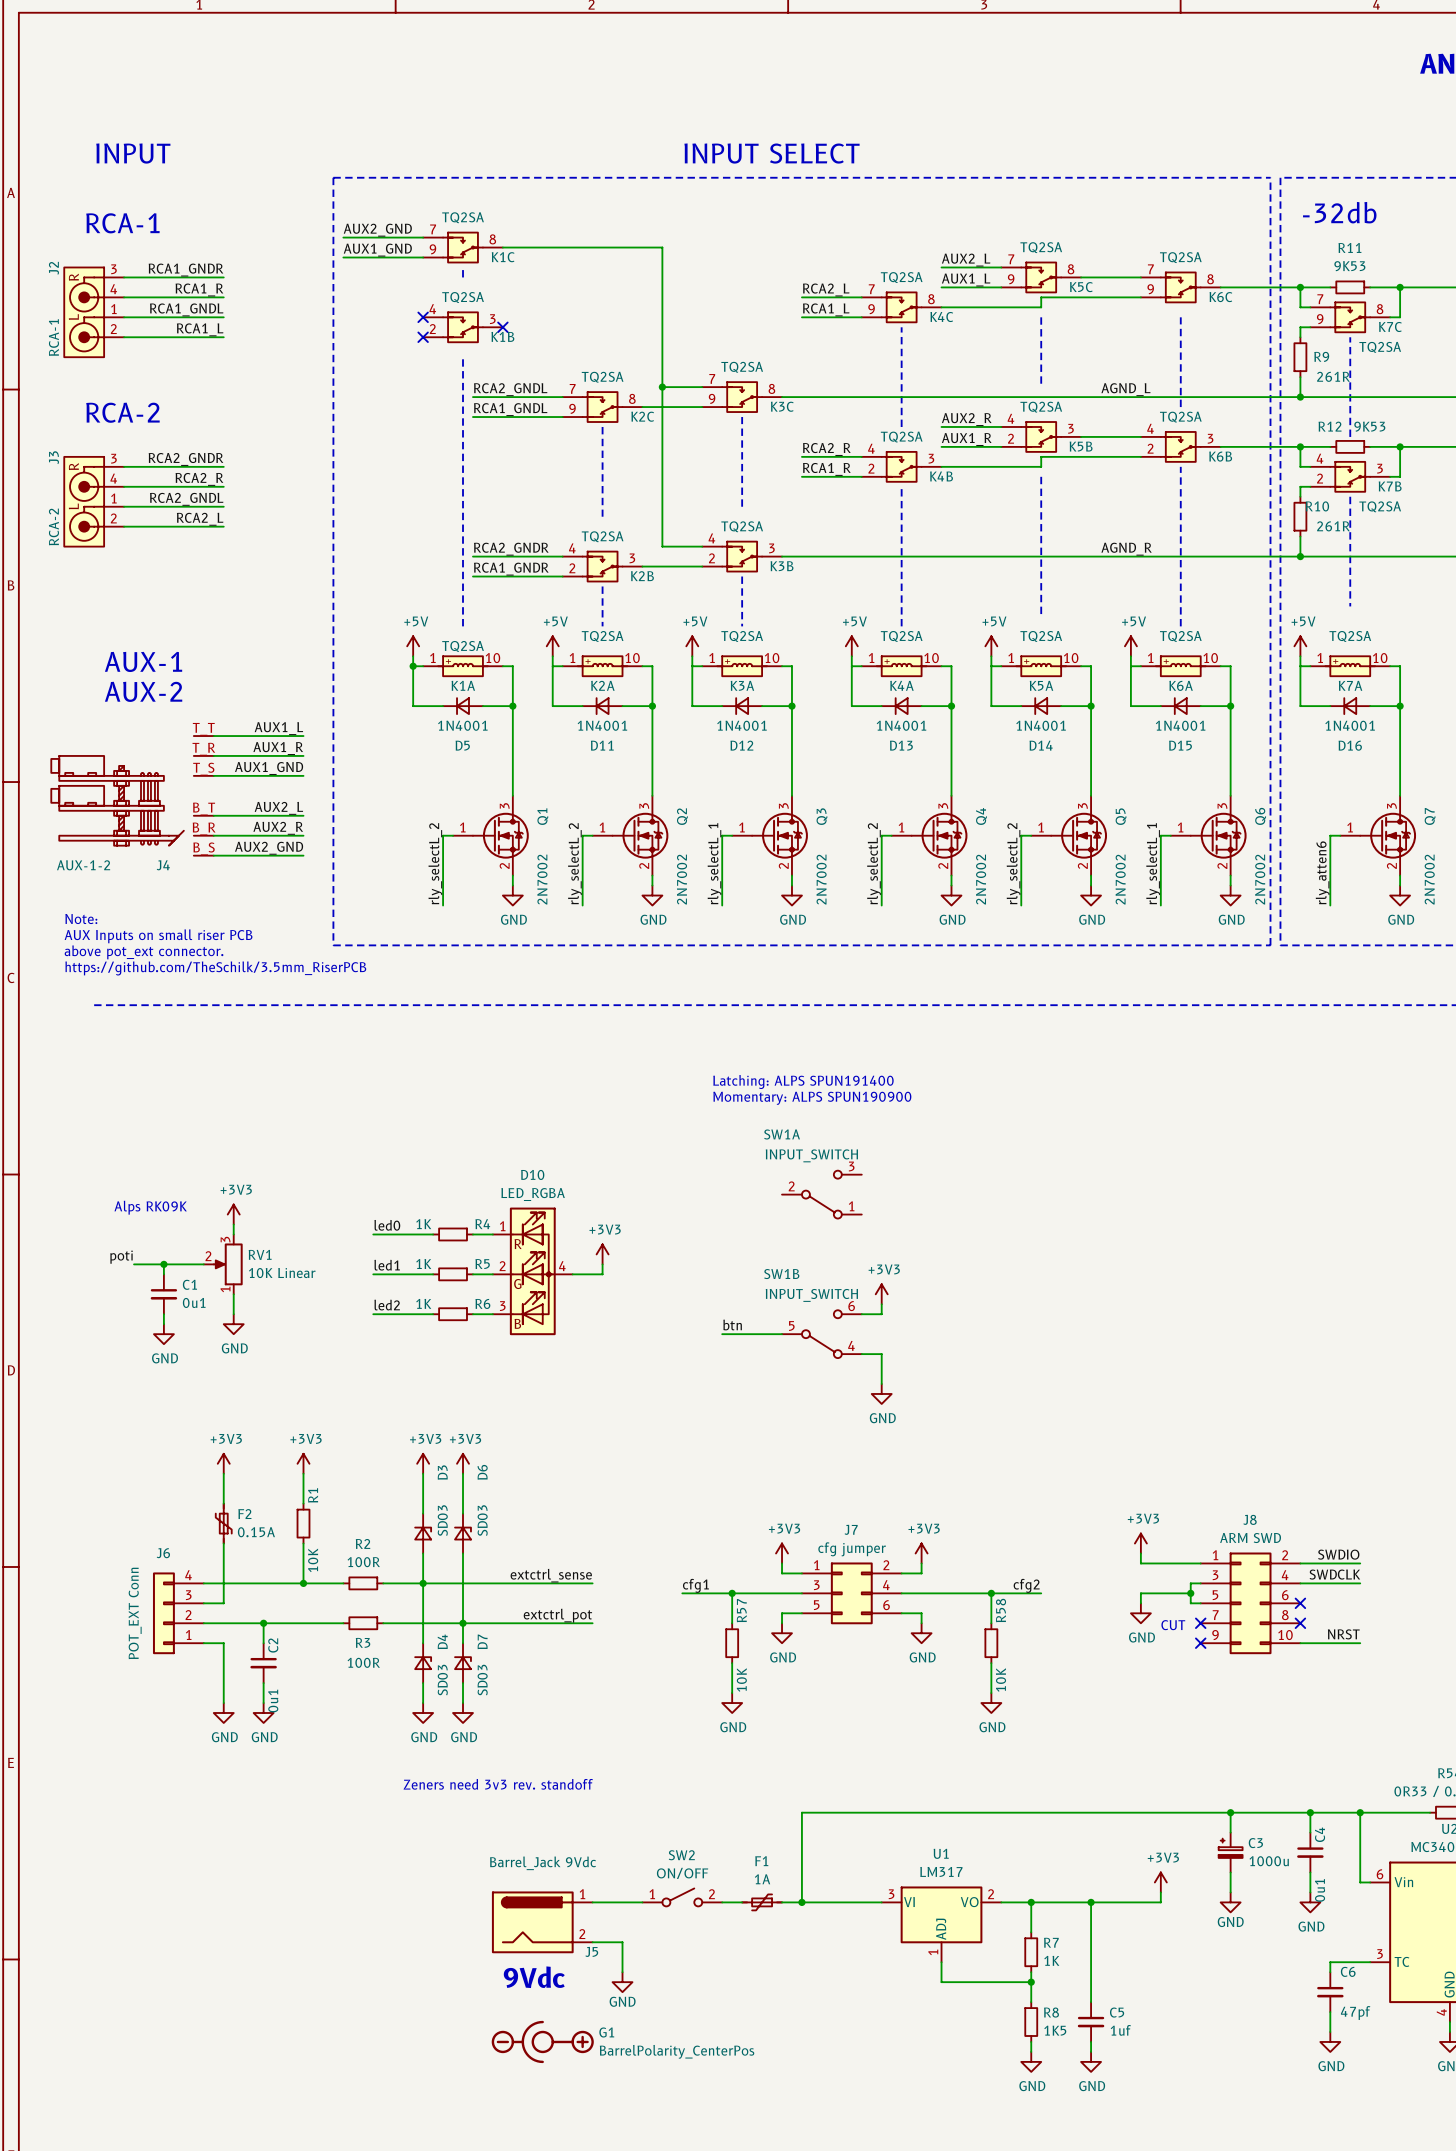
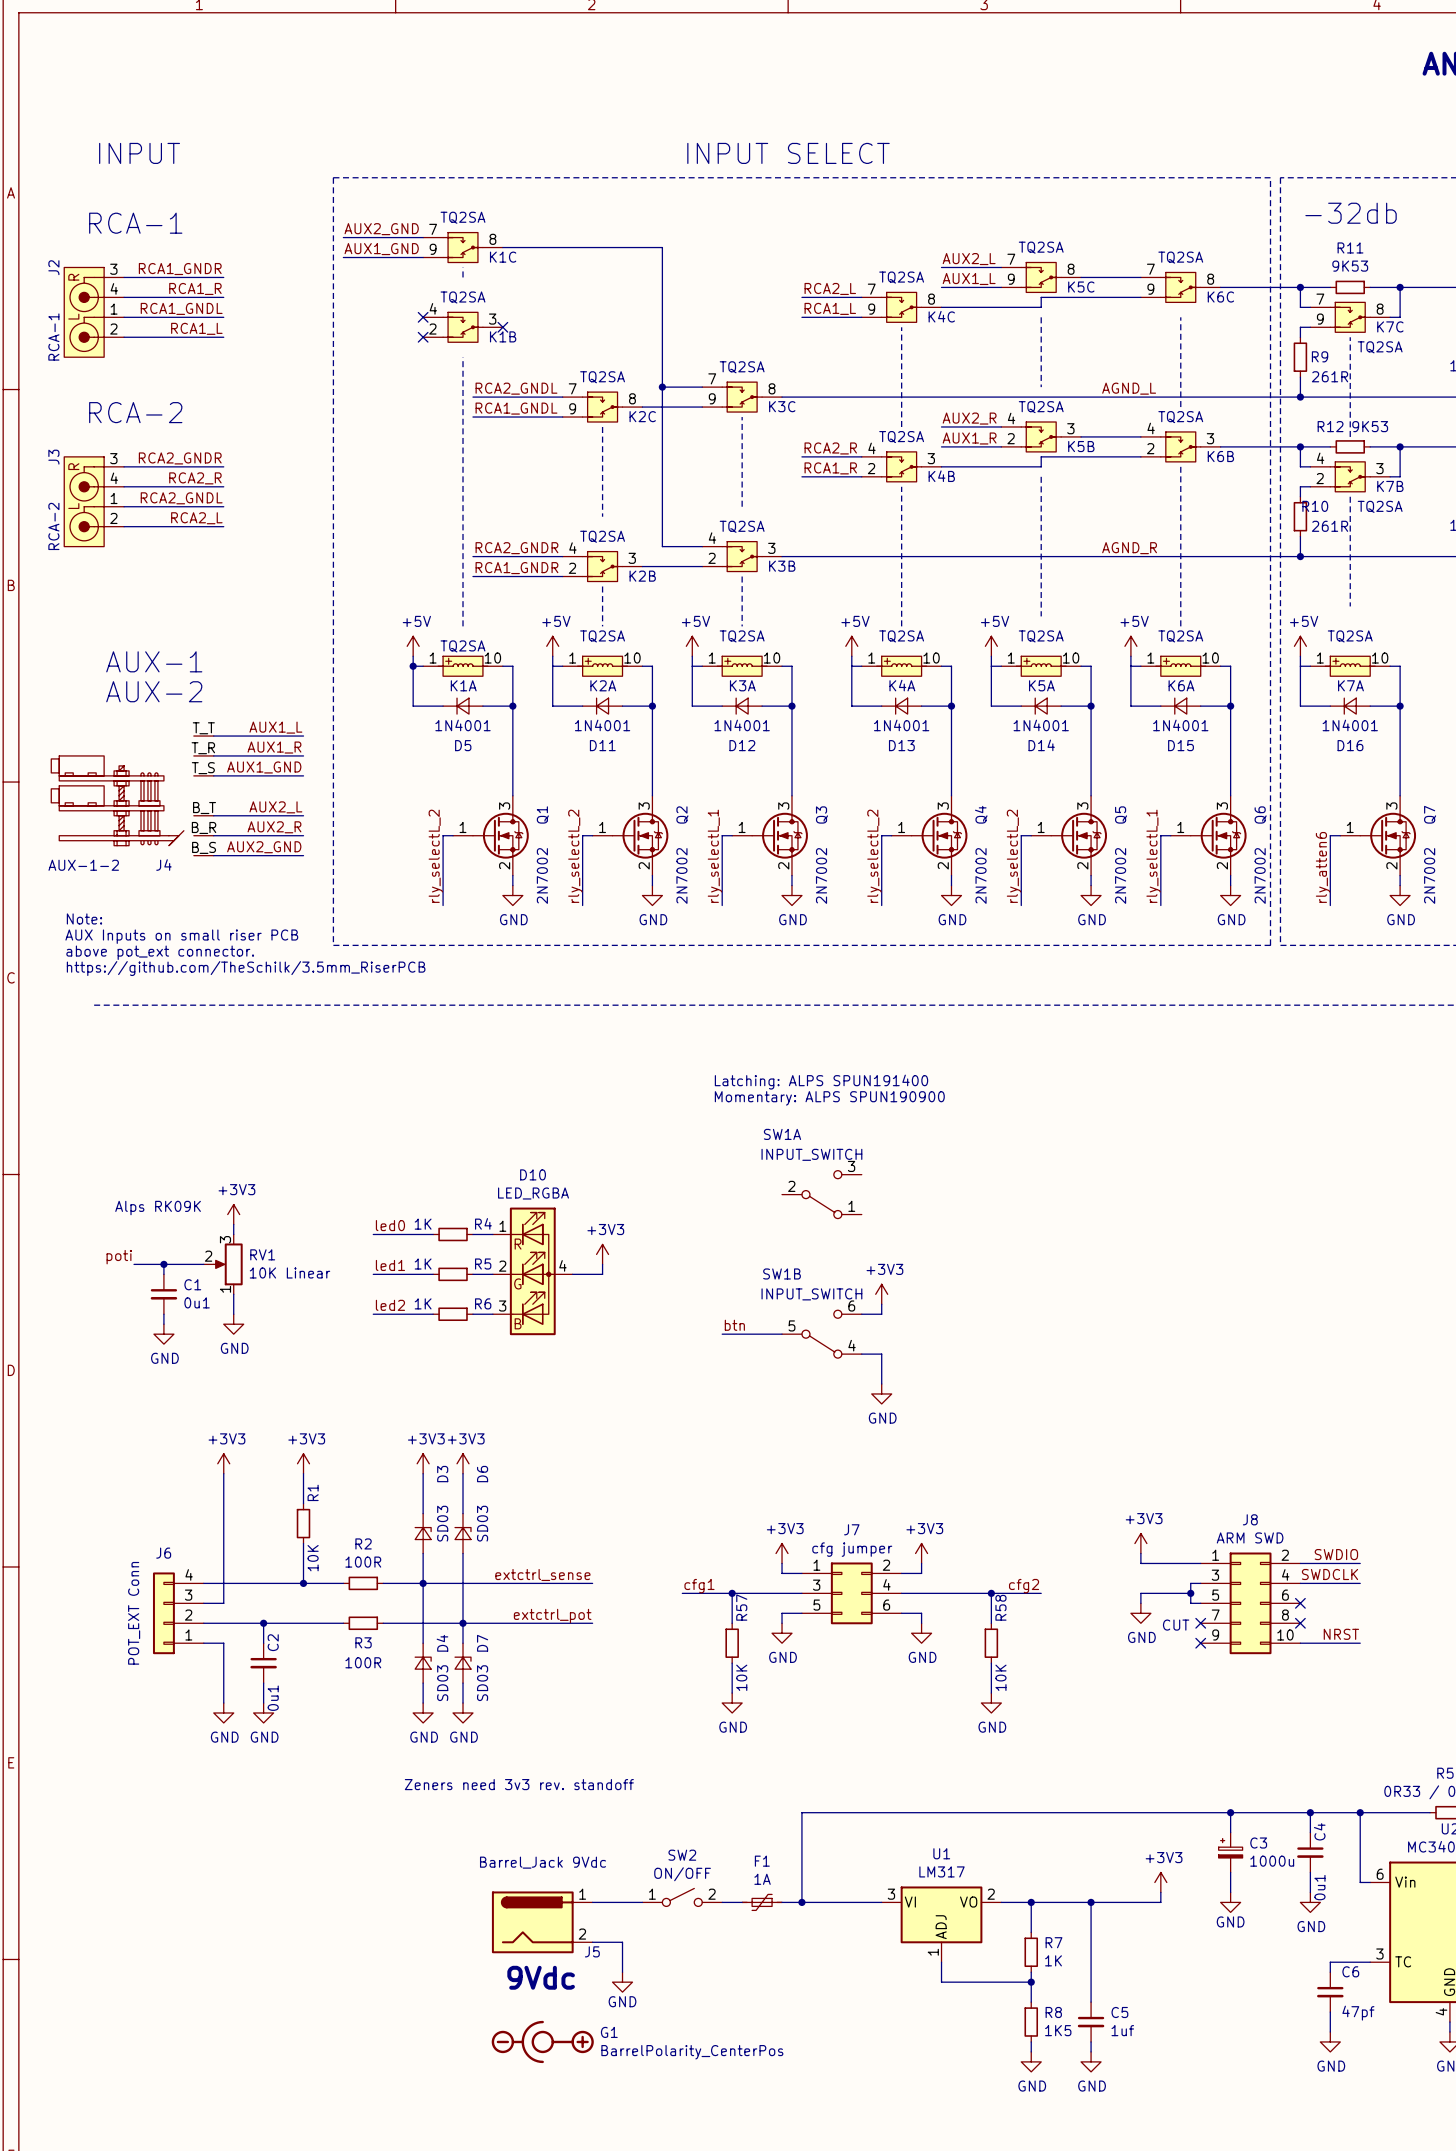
F2: 0.15A (223, 1523) -> none

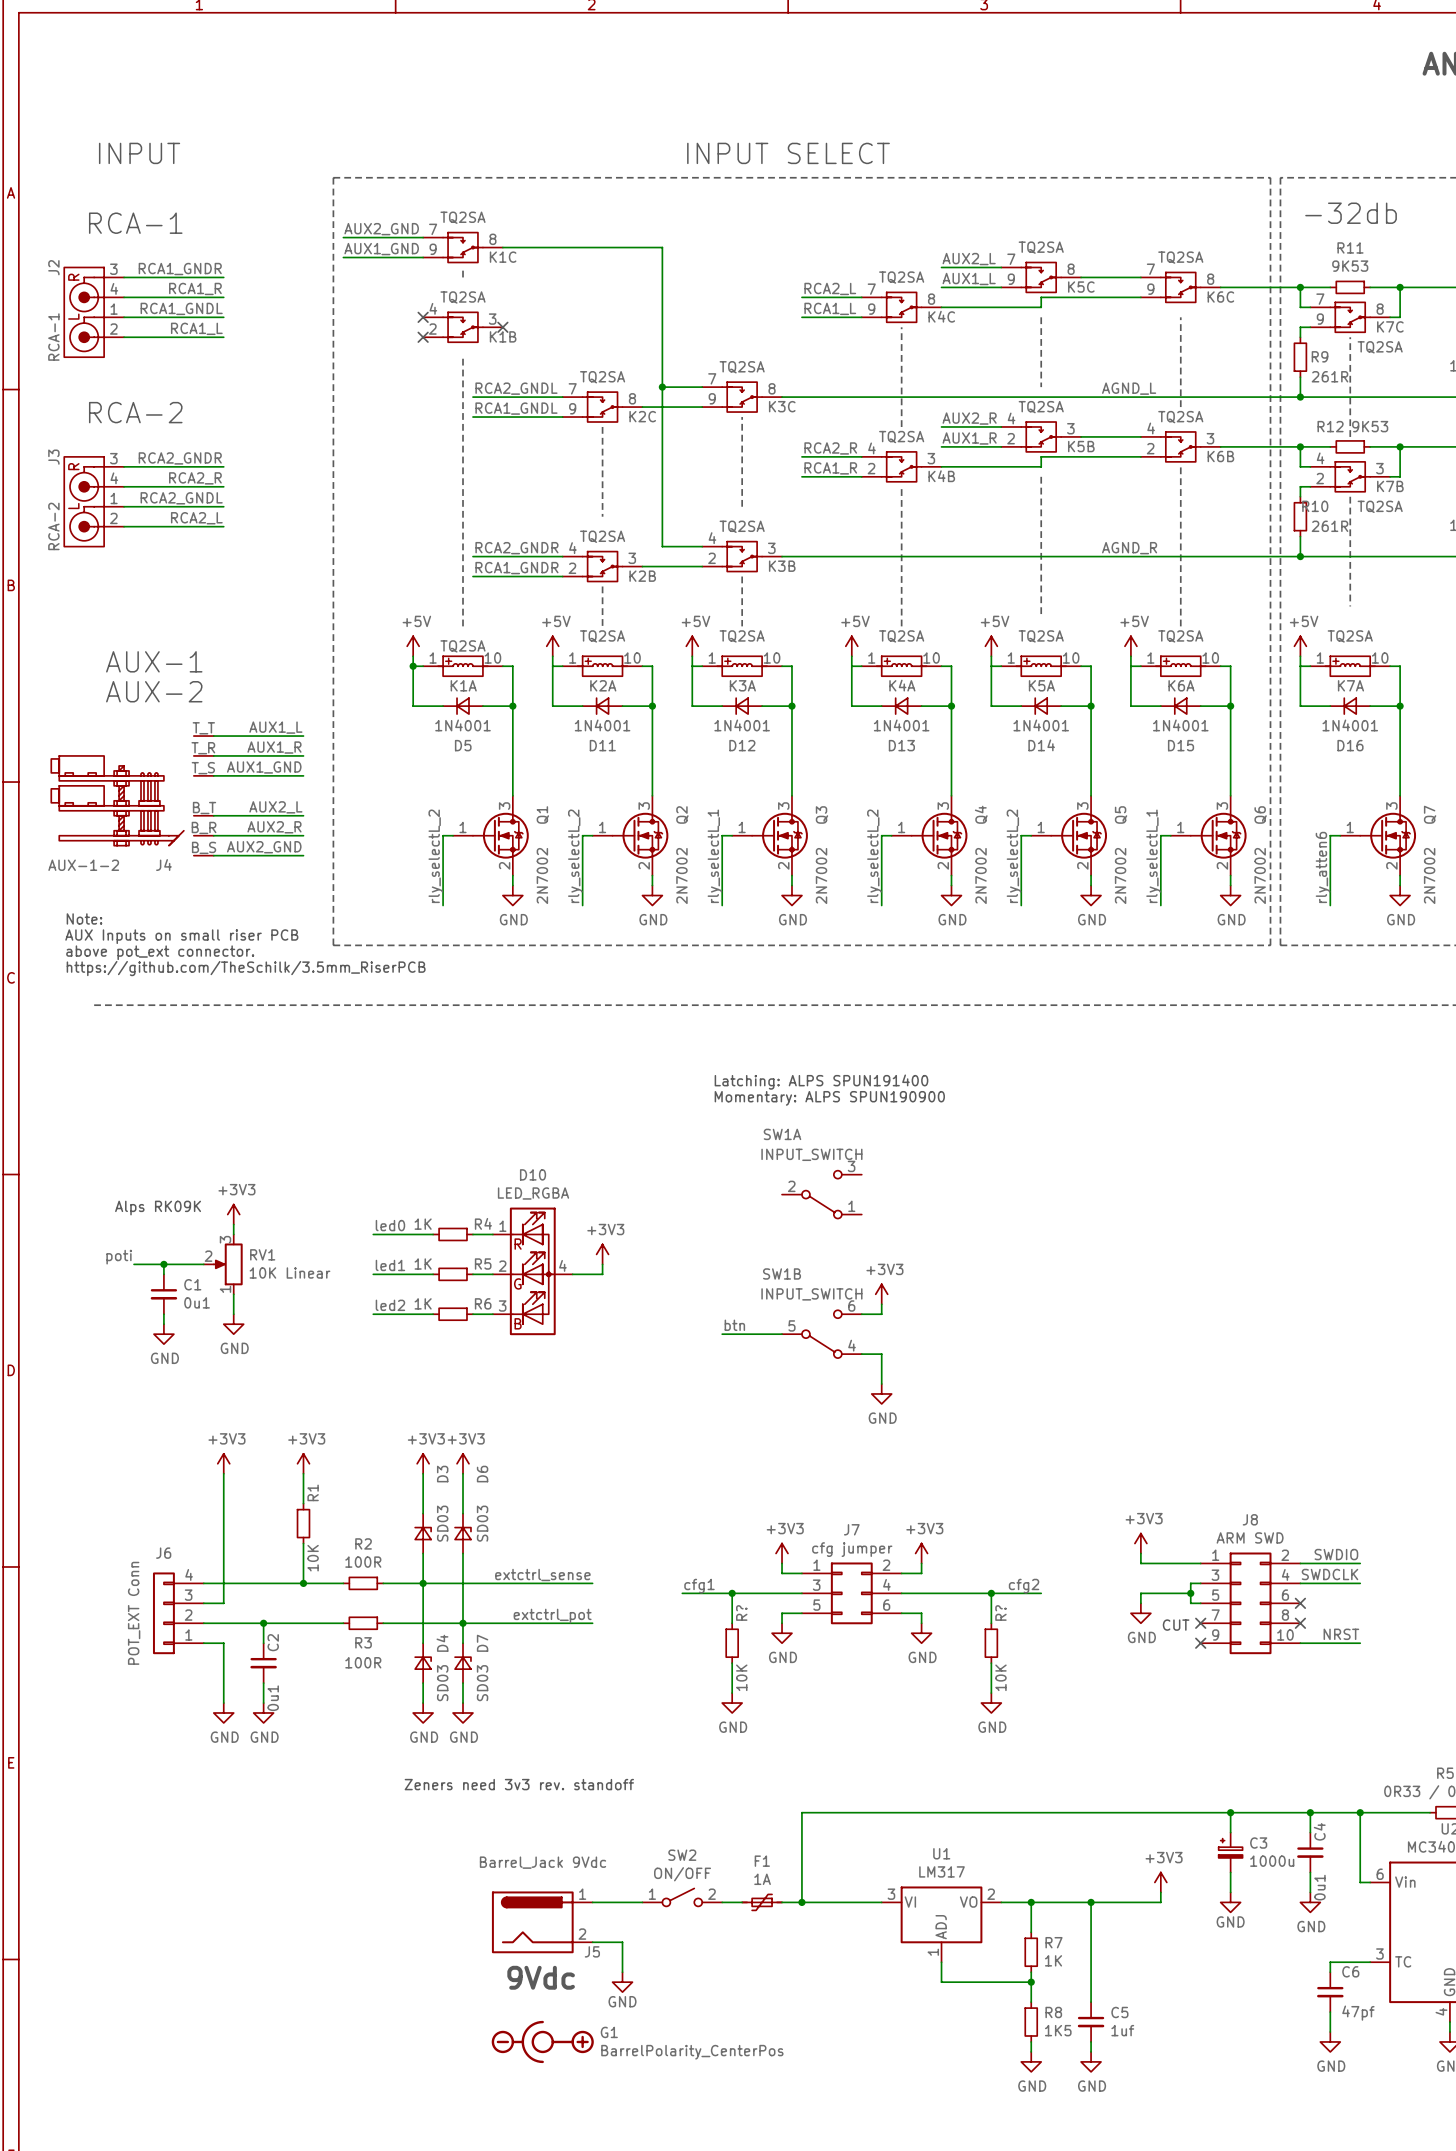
R57 name: R57 (741, 1607) -> R? (741, 1612)
R58 name: R58 (1000, 1607) -> R? (1000, 1612)

